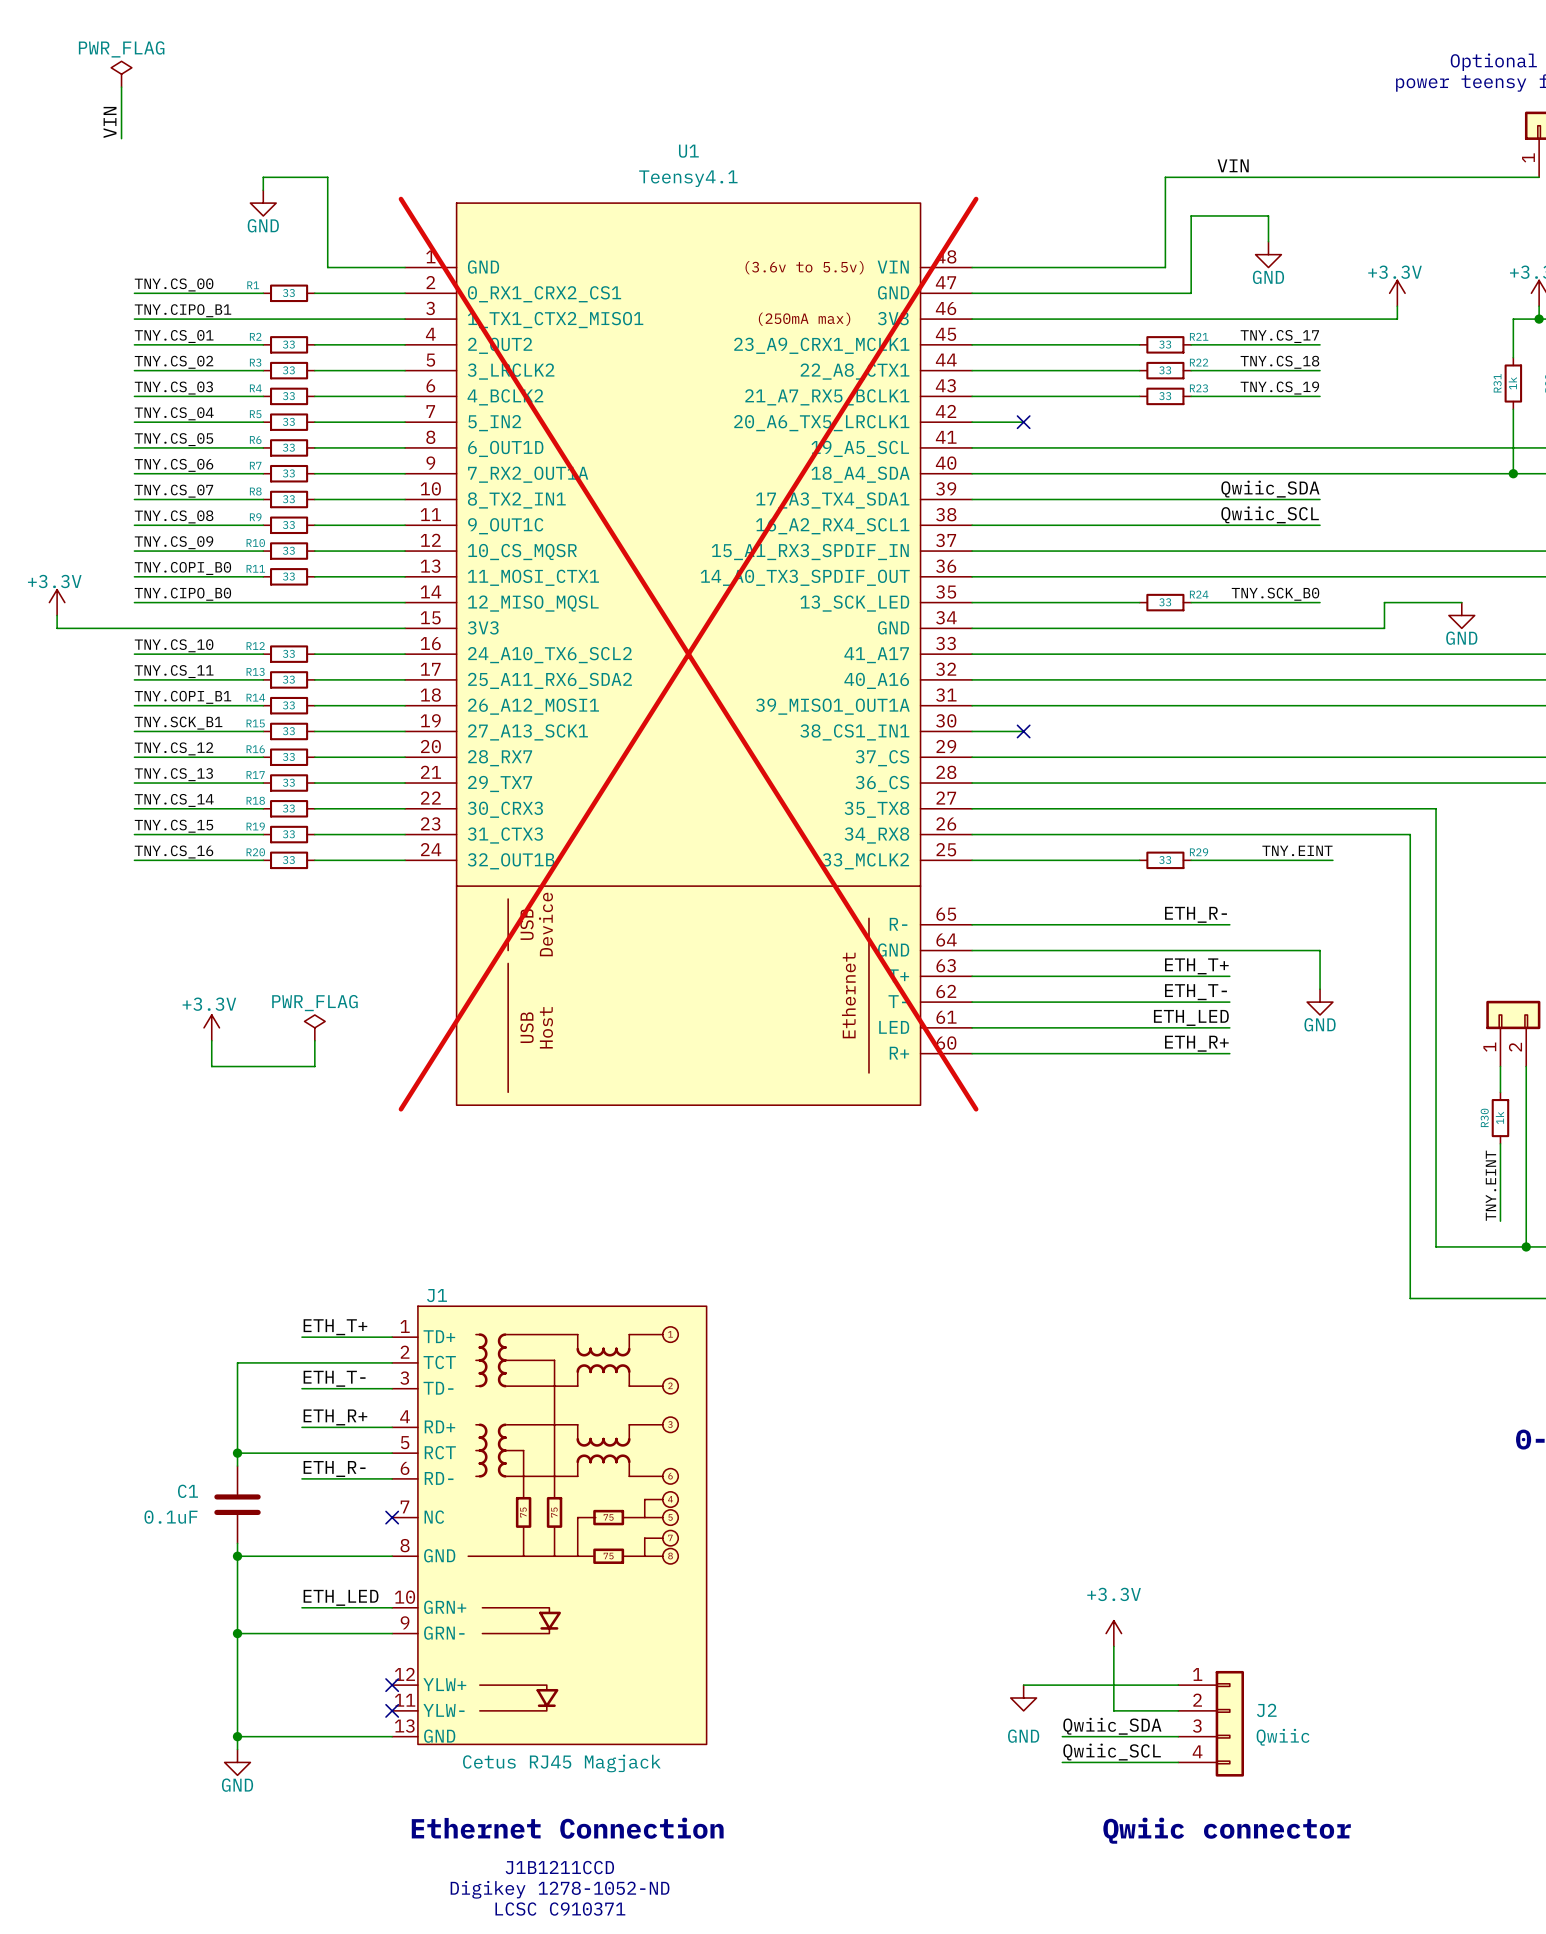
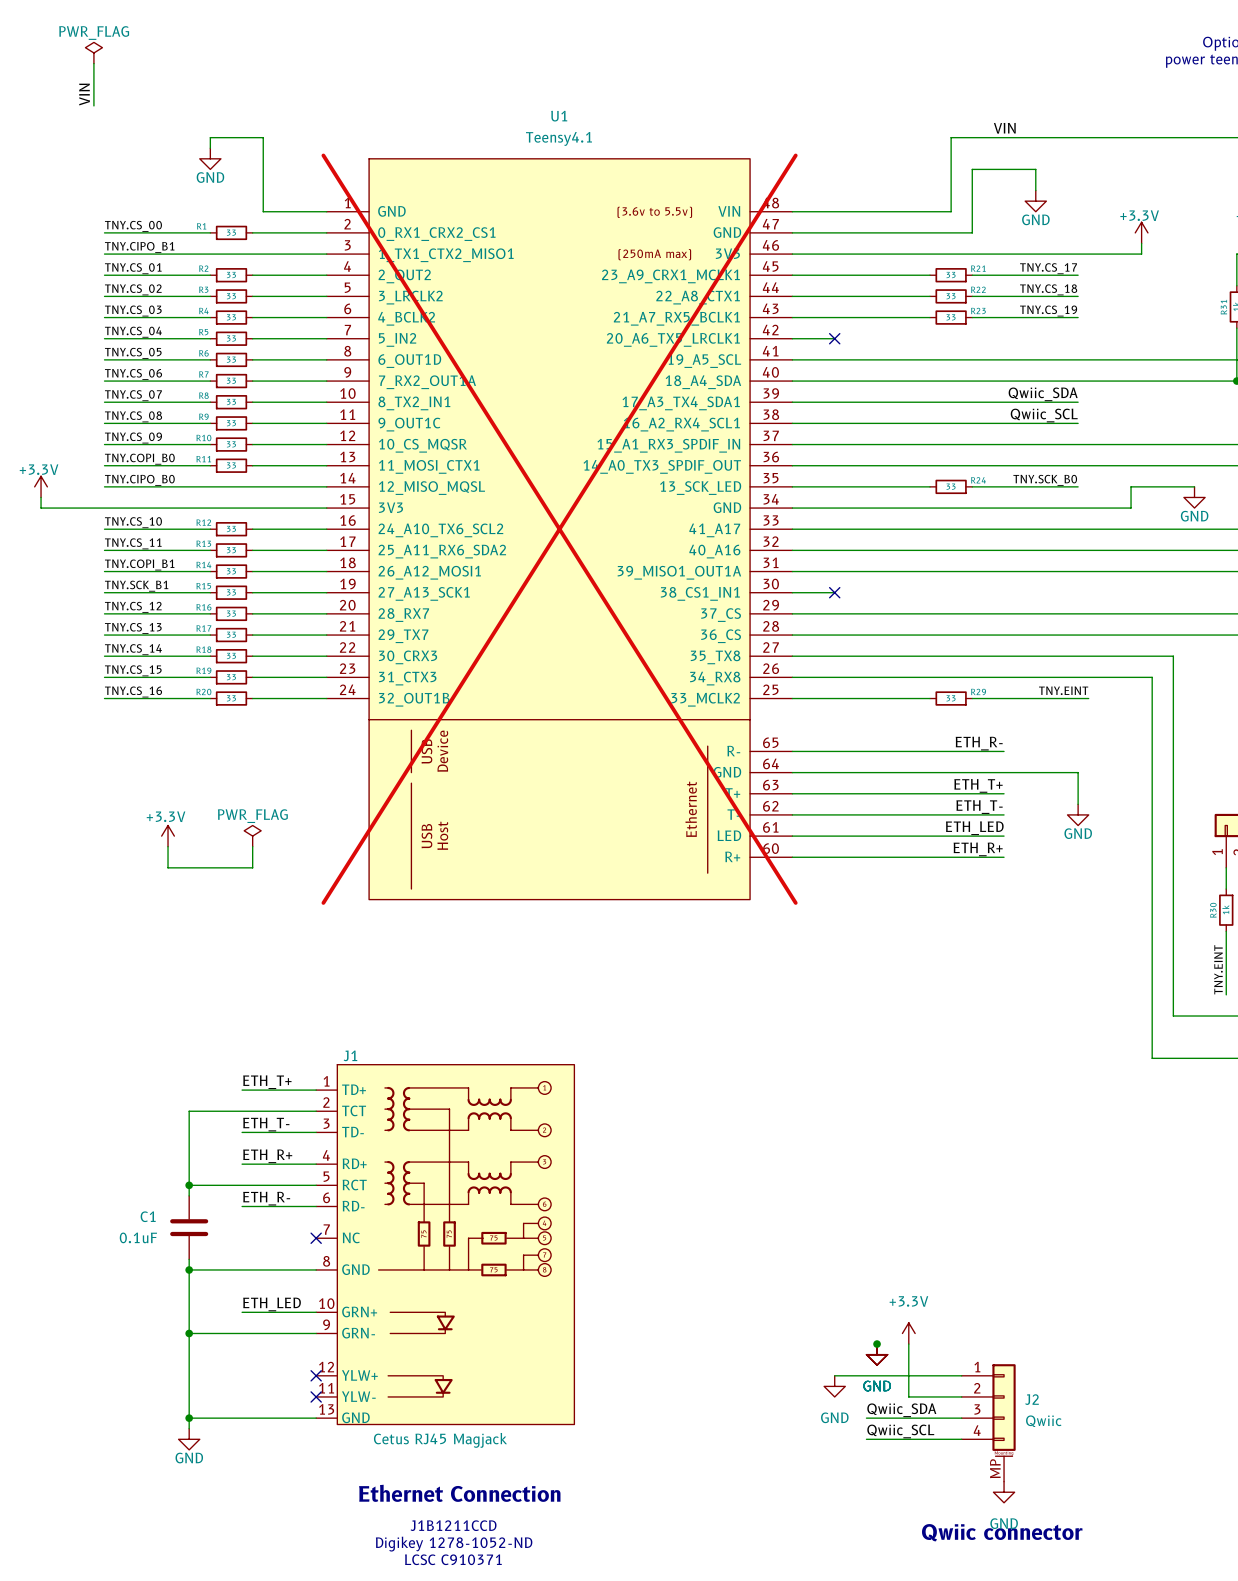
junction: none -> (877, 1344)
power symbol: none -> GND (877, 1354)
J2 symbol: [1178, 1670, 1245, 1777] -> [961, 1364, 1016, 1482]
power symbol: none -> GND (1004, 1492)
text position: Qwiic connector (1227, 1830) -> Qwiic connector (1002, 1532)

